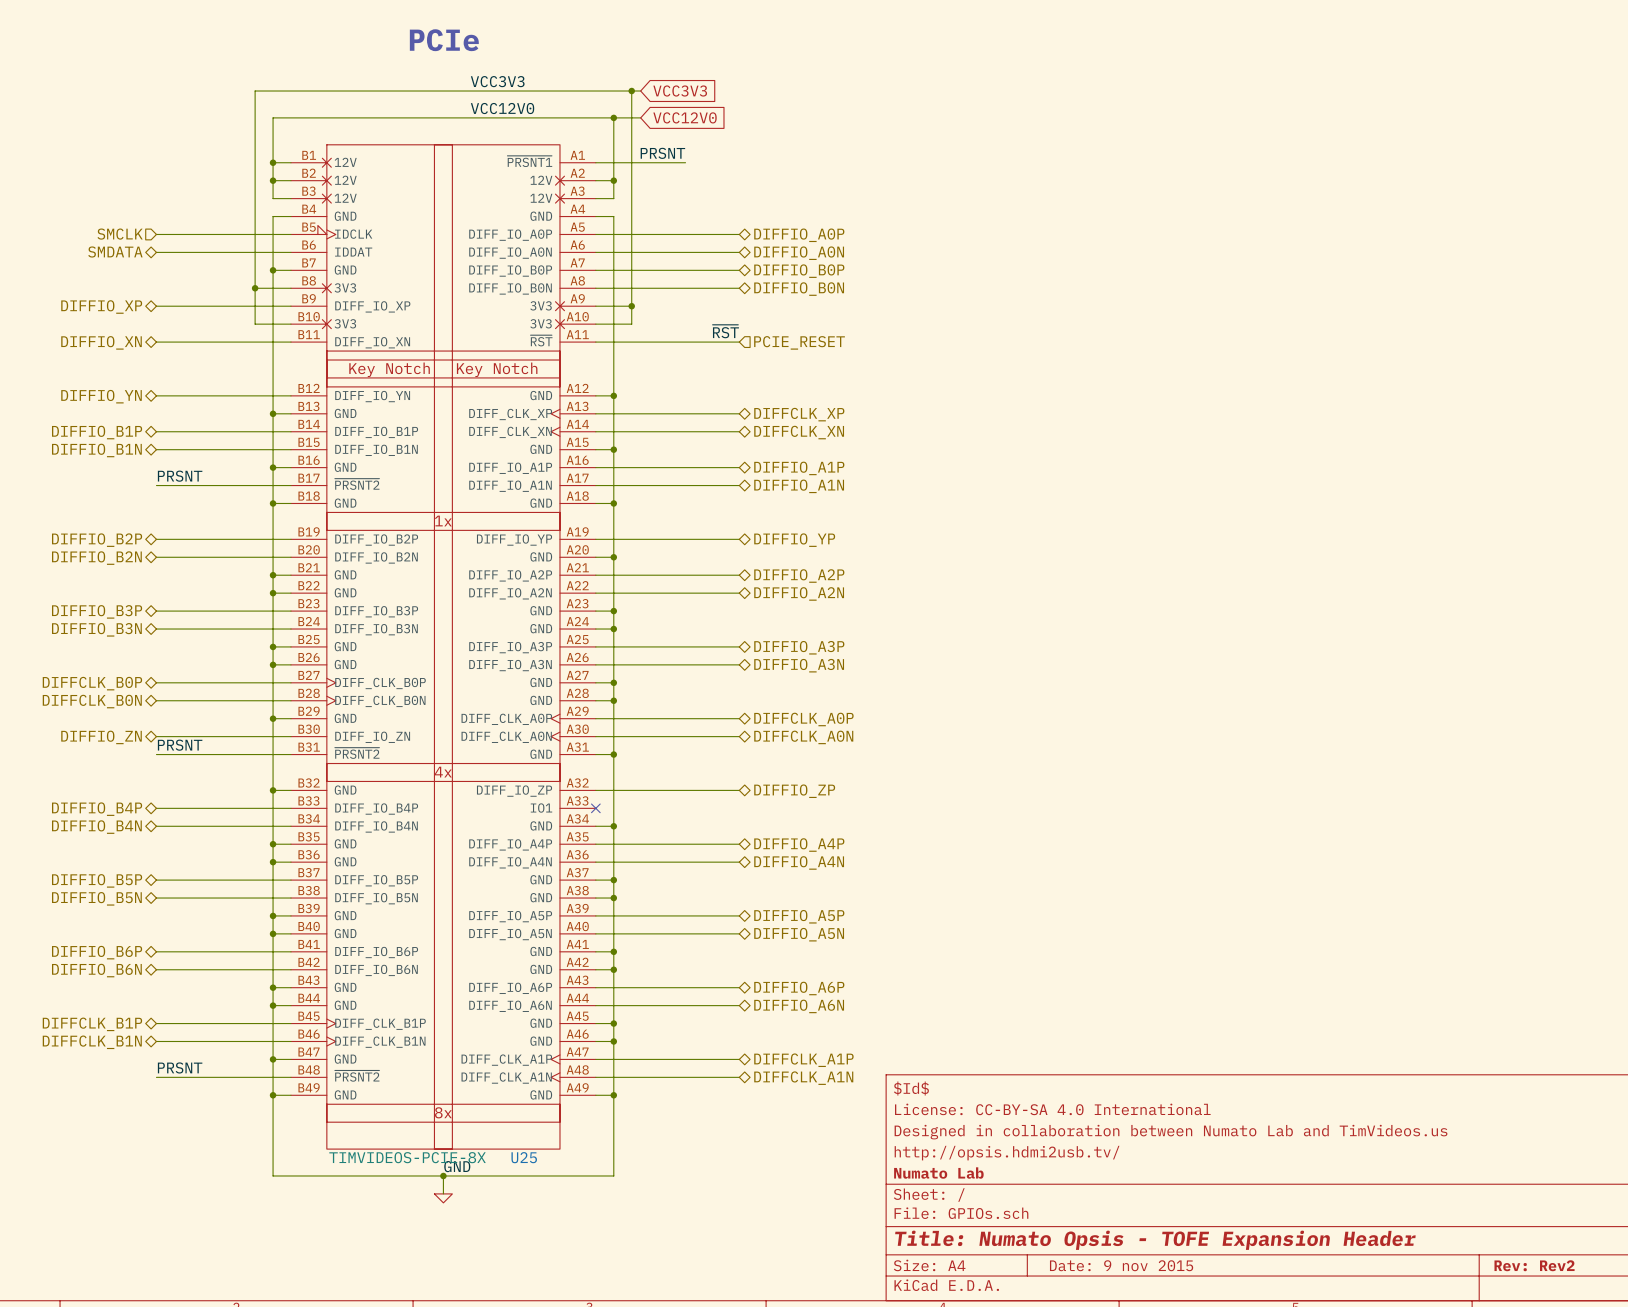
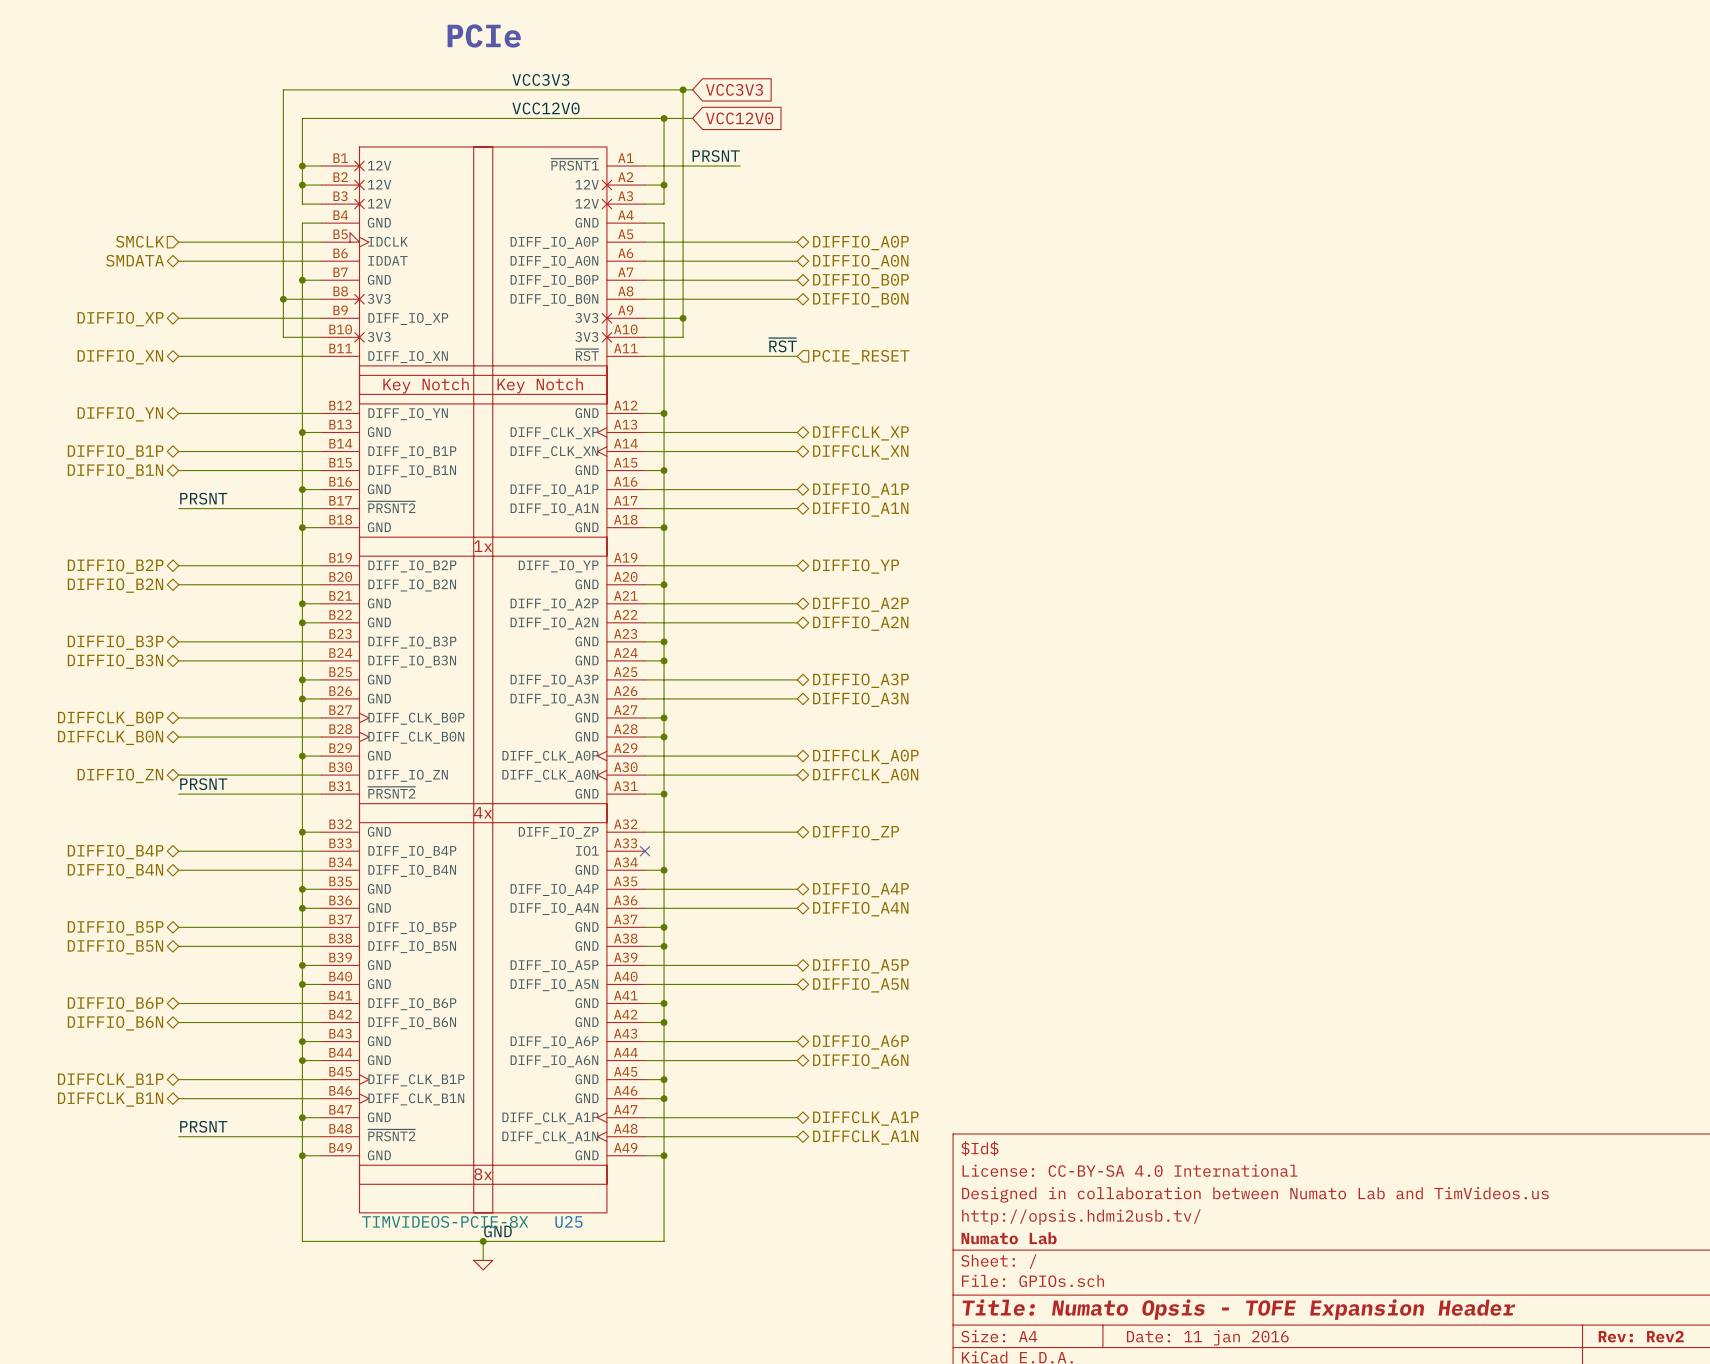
title block: Date: 9 nov 2015 (1121, 1265) -> Date: 11 jan 2016 (1207, 1337)

